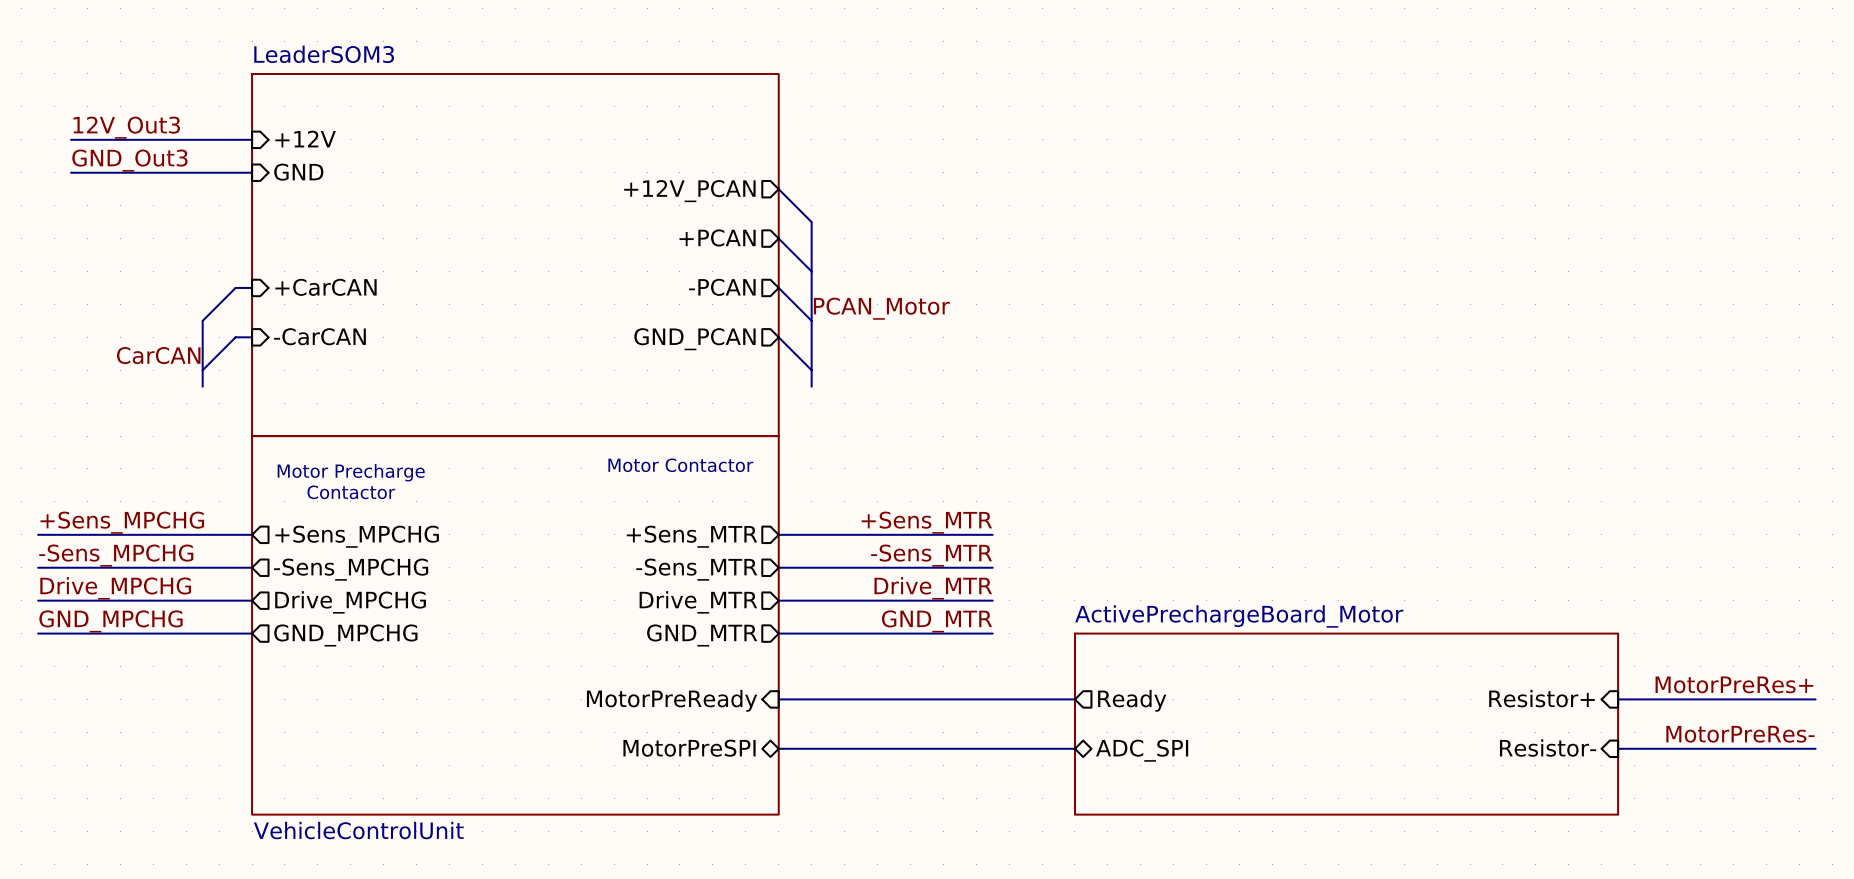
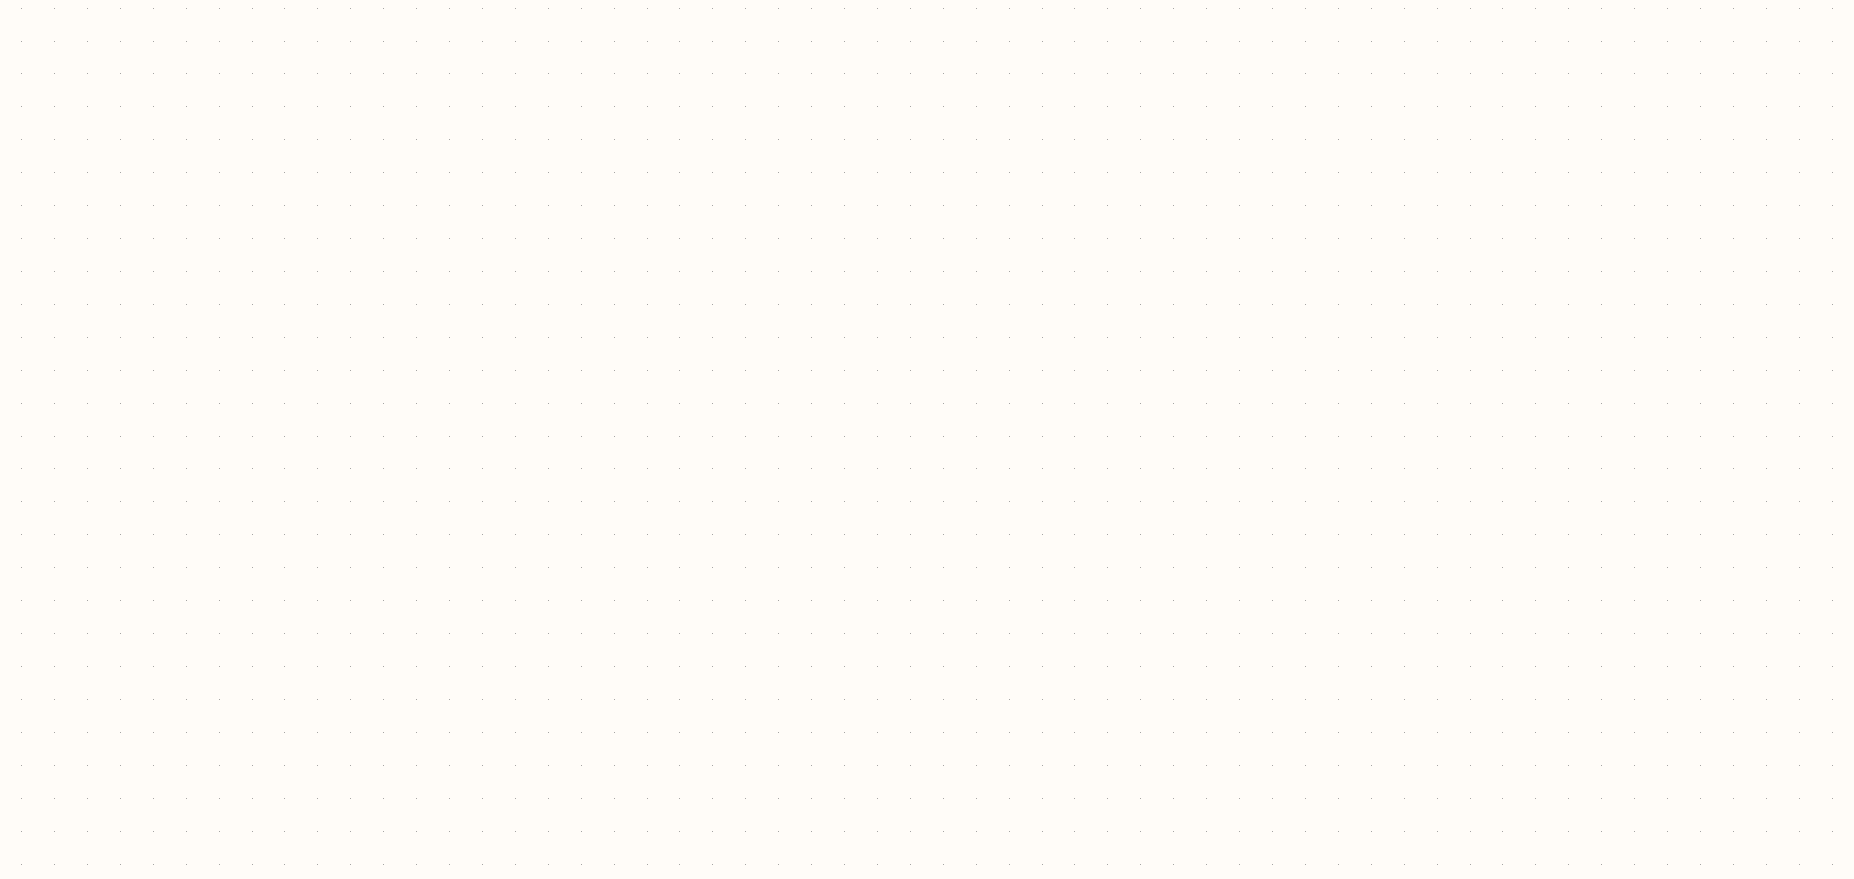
label: 12V_Out3 (126, 127) -> none
wire: (71, 139) (252, 139) -> none
sheet pin: +12V (305, 139) -> none
label: GND_Out3 (129, 160) -> none
wire: (71, 172) (252, 172) -> none
sheet pin: GND (298, 172) -> none
wire: (778, 189) (811, 222) -> none
sheet pin: +12V_PCAN (689, 191) -> none
bus: (811, 222) (811, 386) -> none
sheet pin: +PCAN (717, 237) -> none
wire: (778, 238) (811, 271) -> none
sheet LeaderSOM3: (515, 255) -> none
wire: (252, 287) (235, 287) (202, 320) -> none
sheet pin: +CarCAN (326, 287) -> none
sheet pin: -PCAN (722, 287) -> none
wire: (778, 287) (811, 320) -> none
label: PCAN_Motor (881, 308) -> none
bus: (202, 320) (202, 386) -> none
sheet pin: -CarCAN (319, 336) -> none
wire: (252, 337) (235, 337) (202, 370) -> none
wire: (778, 337) (811, 370) -> none
sheet pin: GND_PCAN (694, 339) -> none
label: CarCAN (158, 355) -> none
text: Motor Contactor (680, 465) -> none
text: Motor Precharge (351, 472) -> none
text: Contactor (351, 492) -> none
label: +Sens_MPCHG (122, 522) -> none
label: +Sens_MTR (926, 522) -> none
wire: (38, 534) (252, 534) -> none
wire: (778, 534) (992, 534) -> none
sheet pin: +Sens_MPCHG (357, 536) -> none
sheet pin: +Sens_MTR (691, 536) -> none
label: -Sens_MPCHG (116, 555) -> none
label: -Sens_MTR (931, 555) -> none
wire: (38, 567) (252, 567) -> none
wire: (778, 567) (992, 567) -> none
sheet pin: -Sens_MPCHG (351, 569) -> none
sheet pin: -Sens_MTR (696, 569) -> none
label: Drive_MPCHG (115, 588) -> none
label: Drive_MTR (933, 588) -> none
wire: (38, 600) (252, 600) -> none
wire: (778, 600) (992, 600) -> none
sheet pin: Drive_MPCHG (350, 602) -> none
sheet pin: Drive_MTR (698, 602) -> none
label: GND_MPCHG (111, 621) -> none
label: GND_MTR (937, 621) -> none
sheet VehicleControlUnit: (515, 625) -> none
wire: (38, 633) (252, 633) -> none
wire: (778, 633) (992, 633) -> none
sheet pin: GND_MPCHG (345, 635) -> none
sheet pin: GND_MTR (702, 635) -> none
label: MotorPreRes+ (1734, 684) -> none
sheet pin: Resistor+ (1542, 698) -> none
wire: (778, 699) (1074, 699) -> none
wire: (1618, 699) (1815, 699) -> none
sheet pin: MotorPreReady (672, 700) -> none
sheet pin: Ready (1132, 700) -> none
sheet ActivePrechargeBoard_Motor: (1346, 724) -> none
label: MotorPreRes- (1740, 734) -> none
sheet pin: Resistor- (1548, 747) -> none
sheet pin: MotorPreSPI (689, 748) -> none
wire: (778, 748) (1074, 748) -> none
wire: (1618, 748) (1815, 748) -> none
sheet pin: ADC_SPI (1142, 750) -> none

